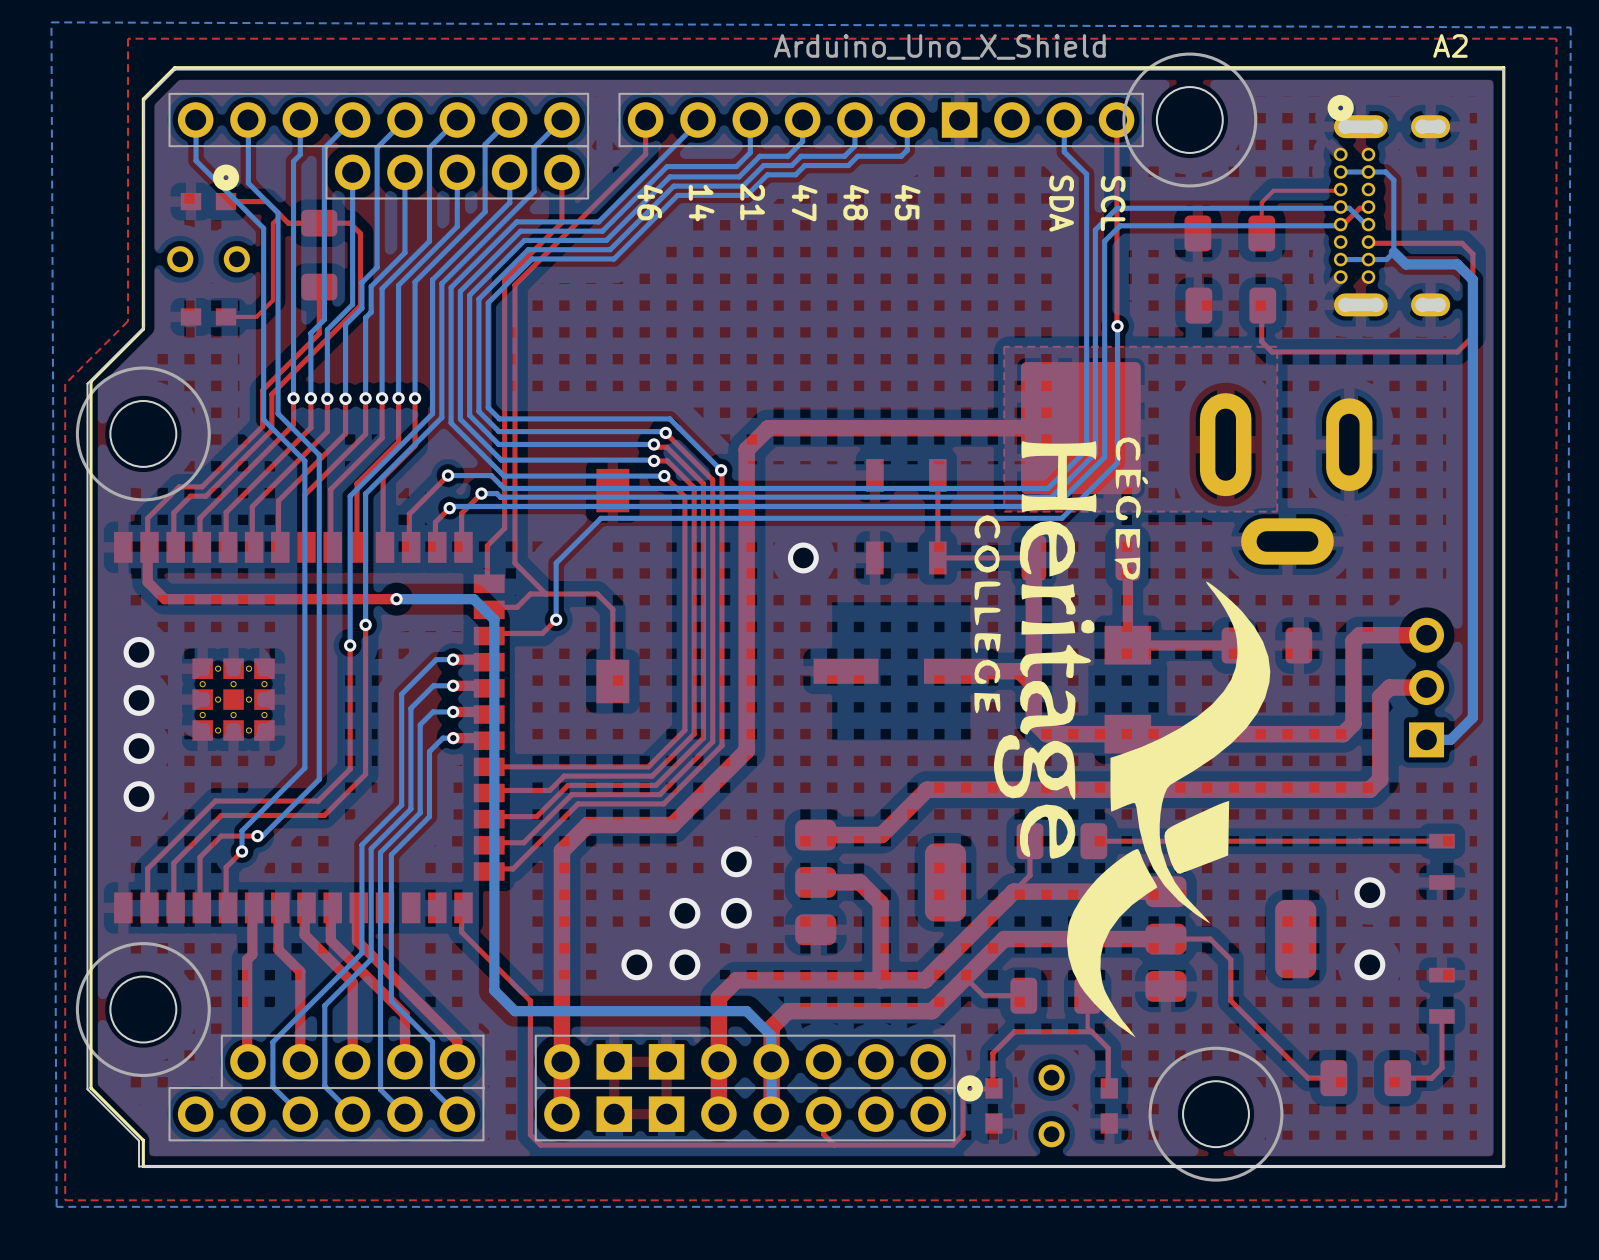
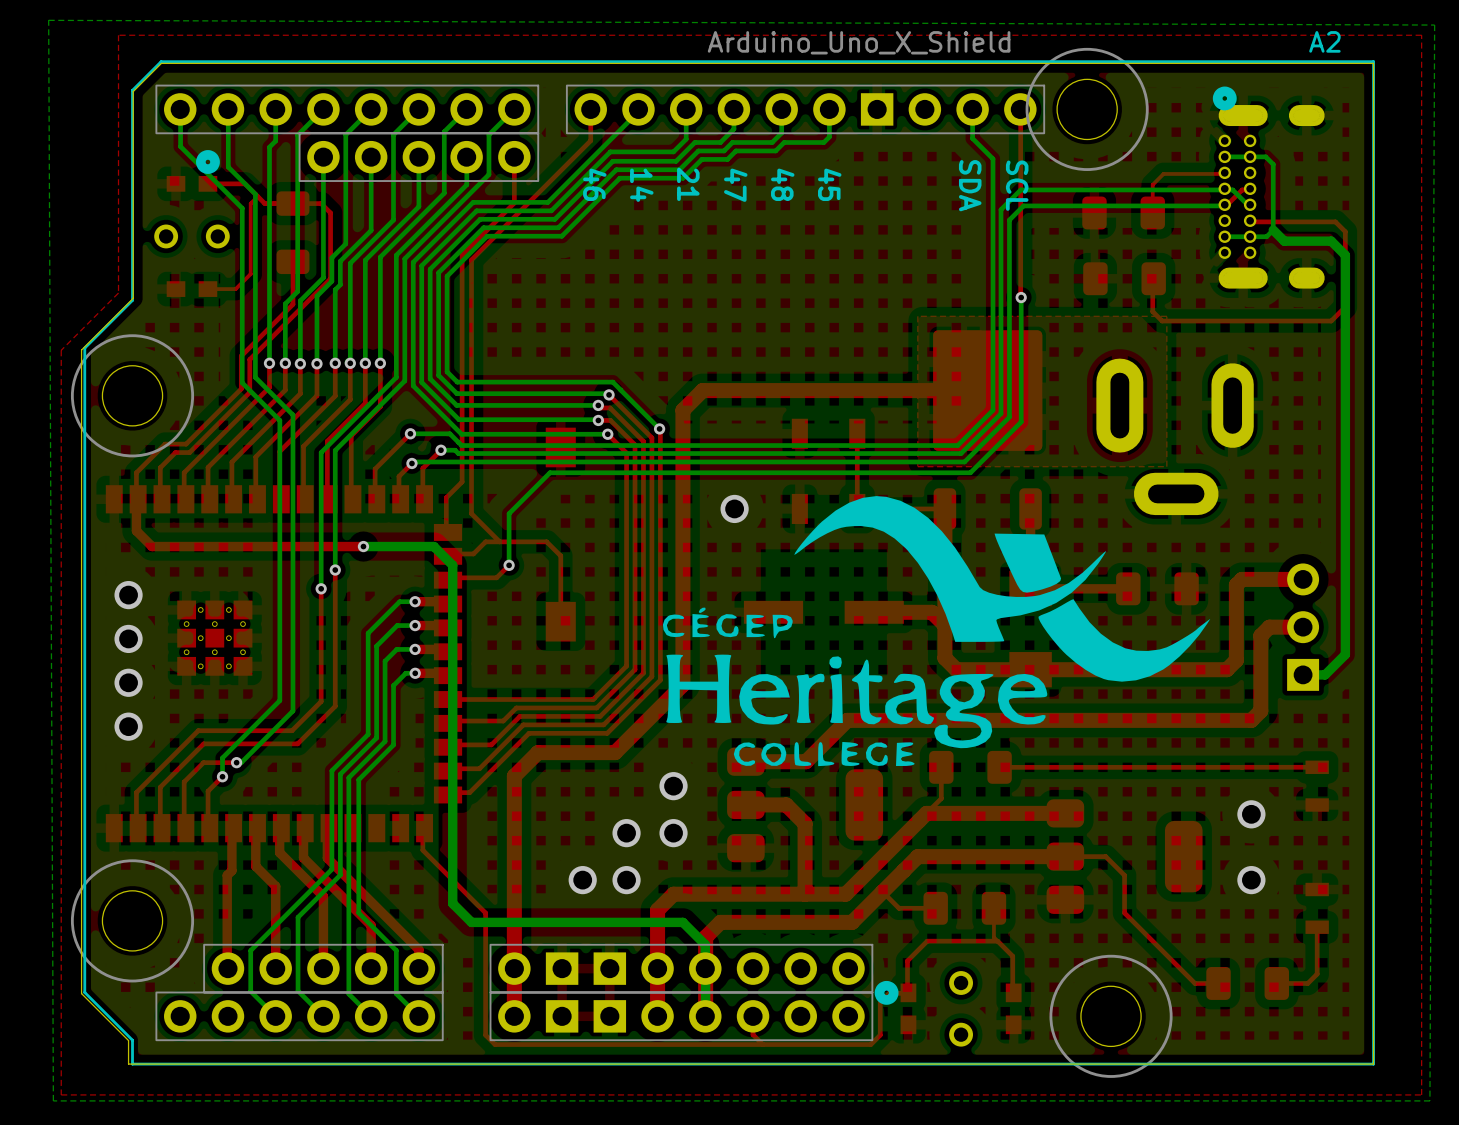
drawing: [974, 437, 1271, 1038] -> none
drawing: none -> [662, 496, 1211, 767]

